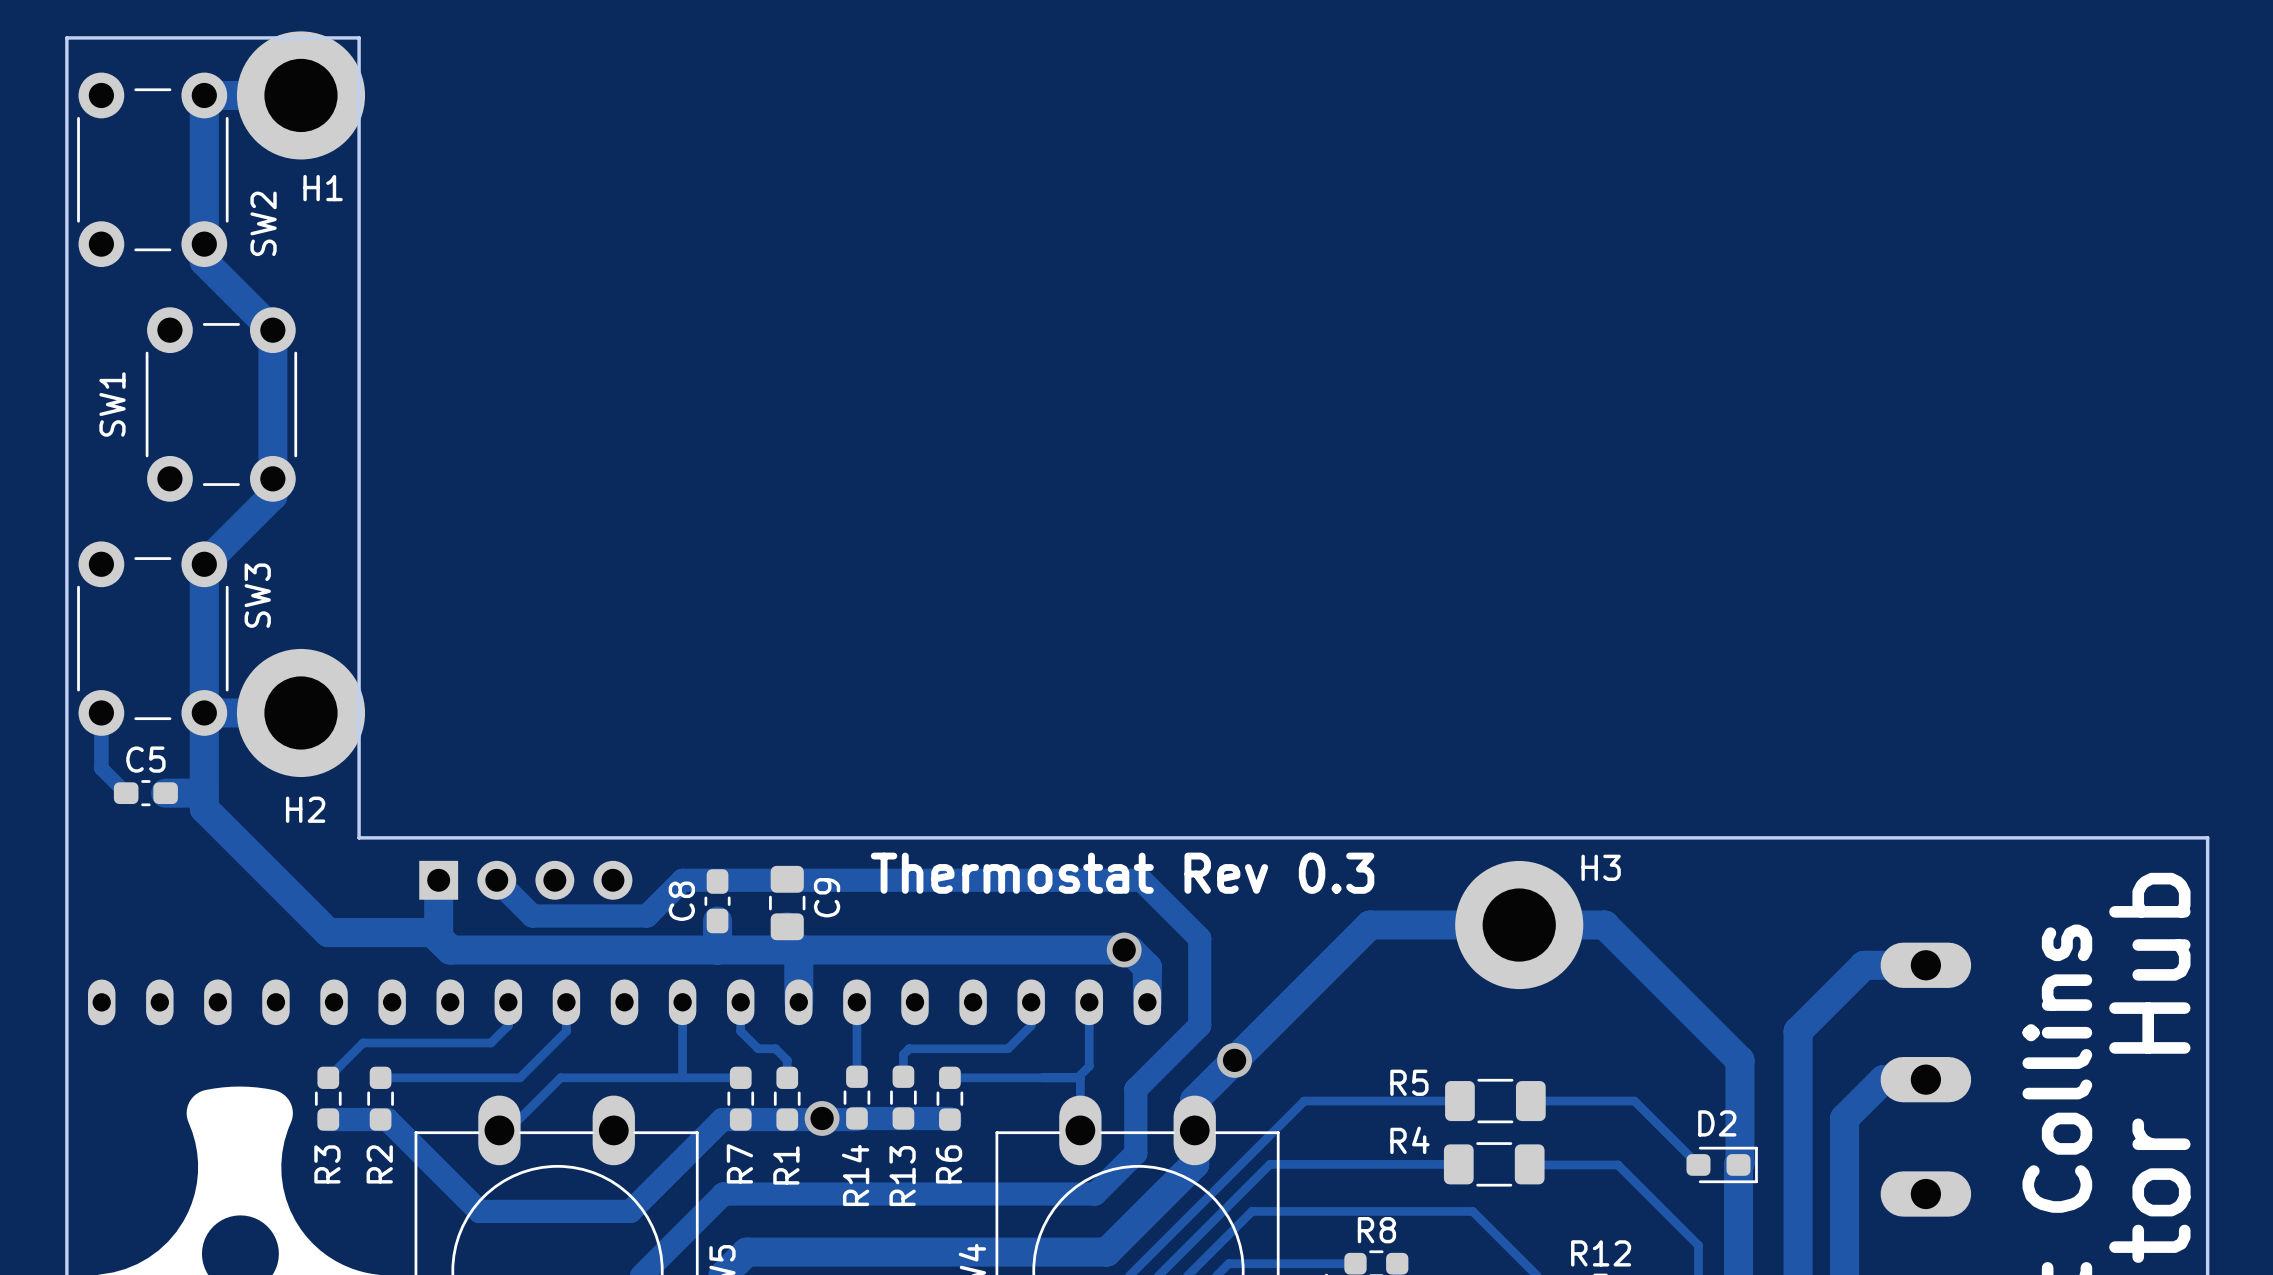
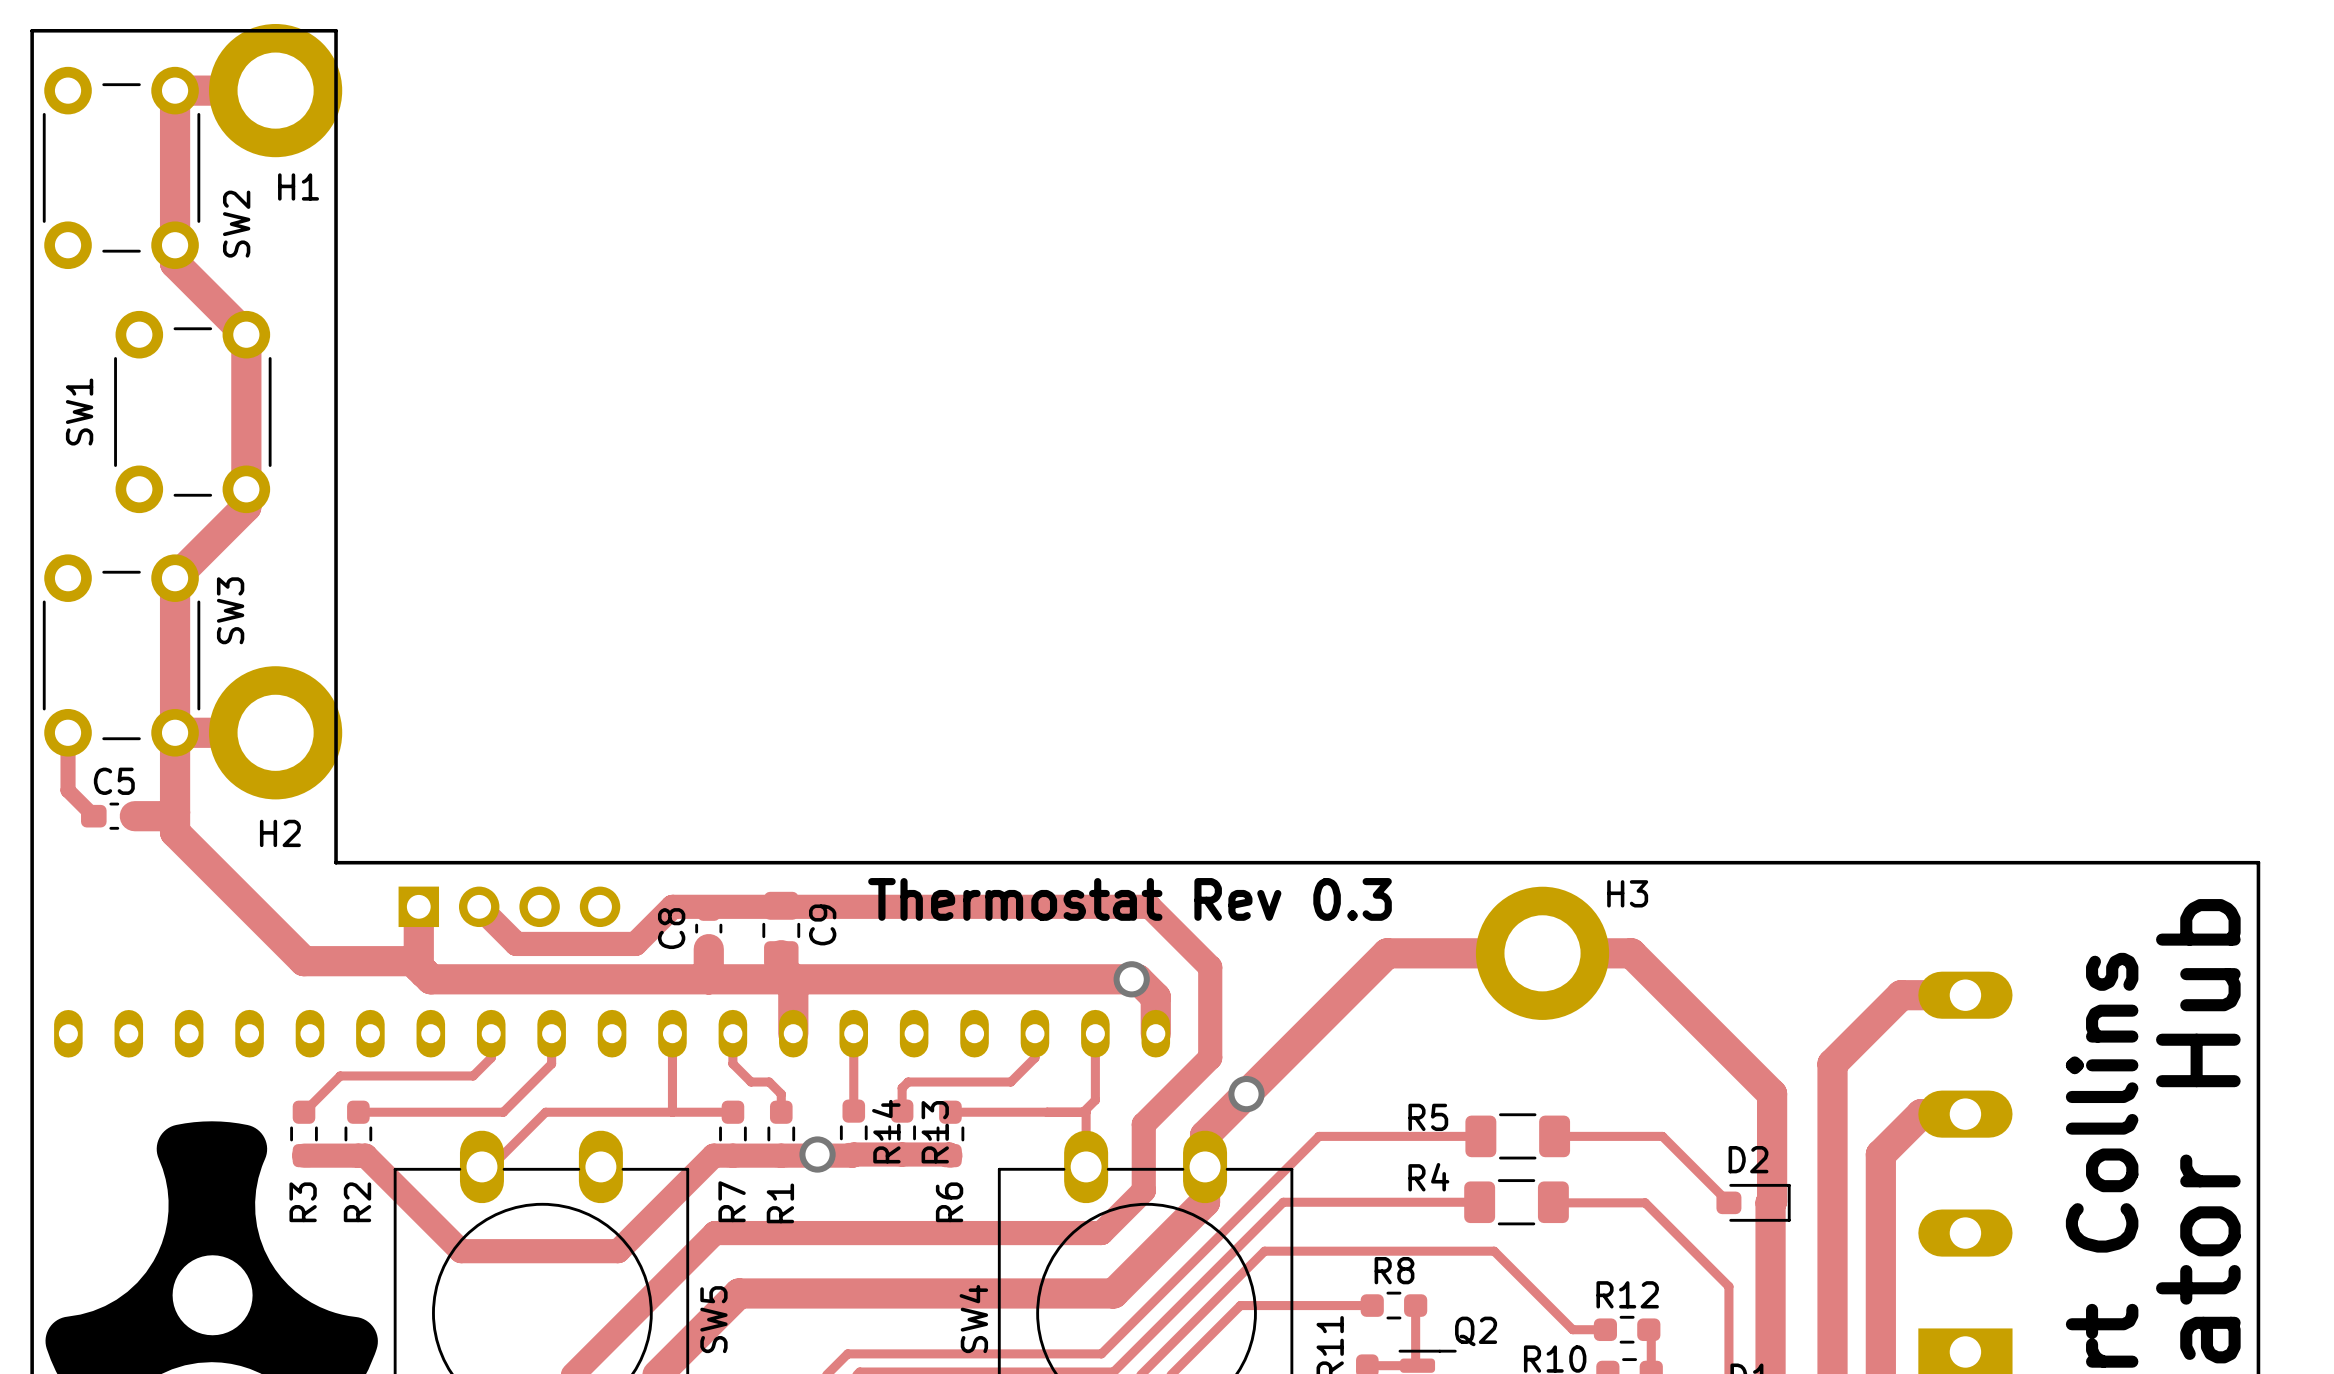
R14 name position: R14 (855, 1175) -> R14 (886, 1131)
R13 name position: R13 (902, 1176) -> R13 (935, 1132)

